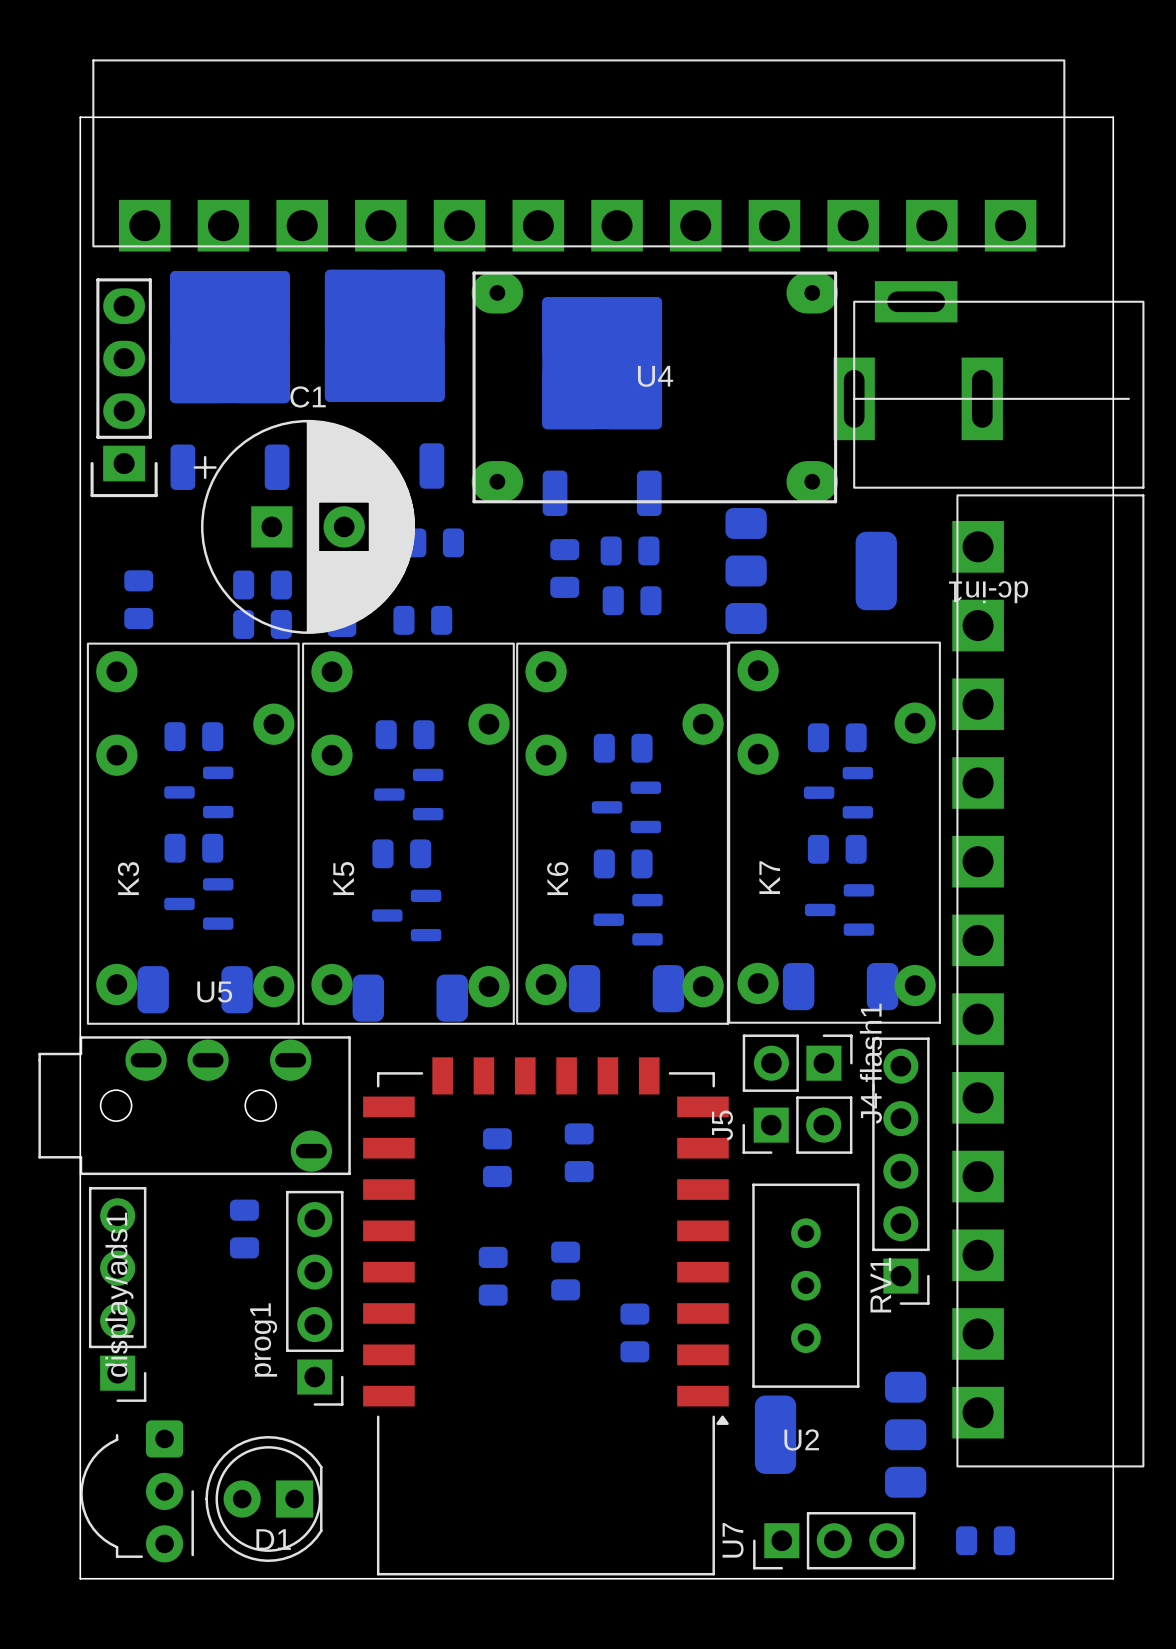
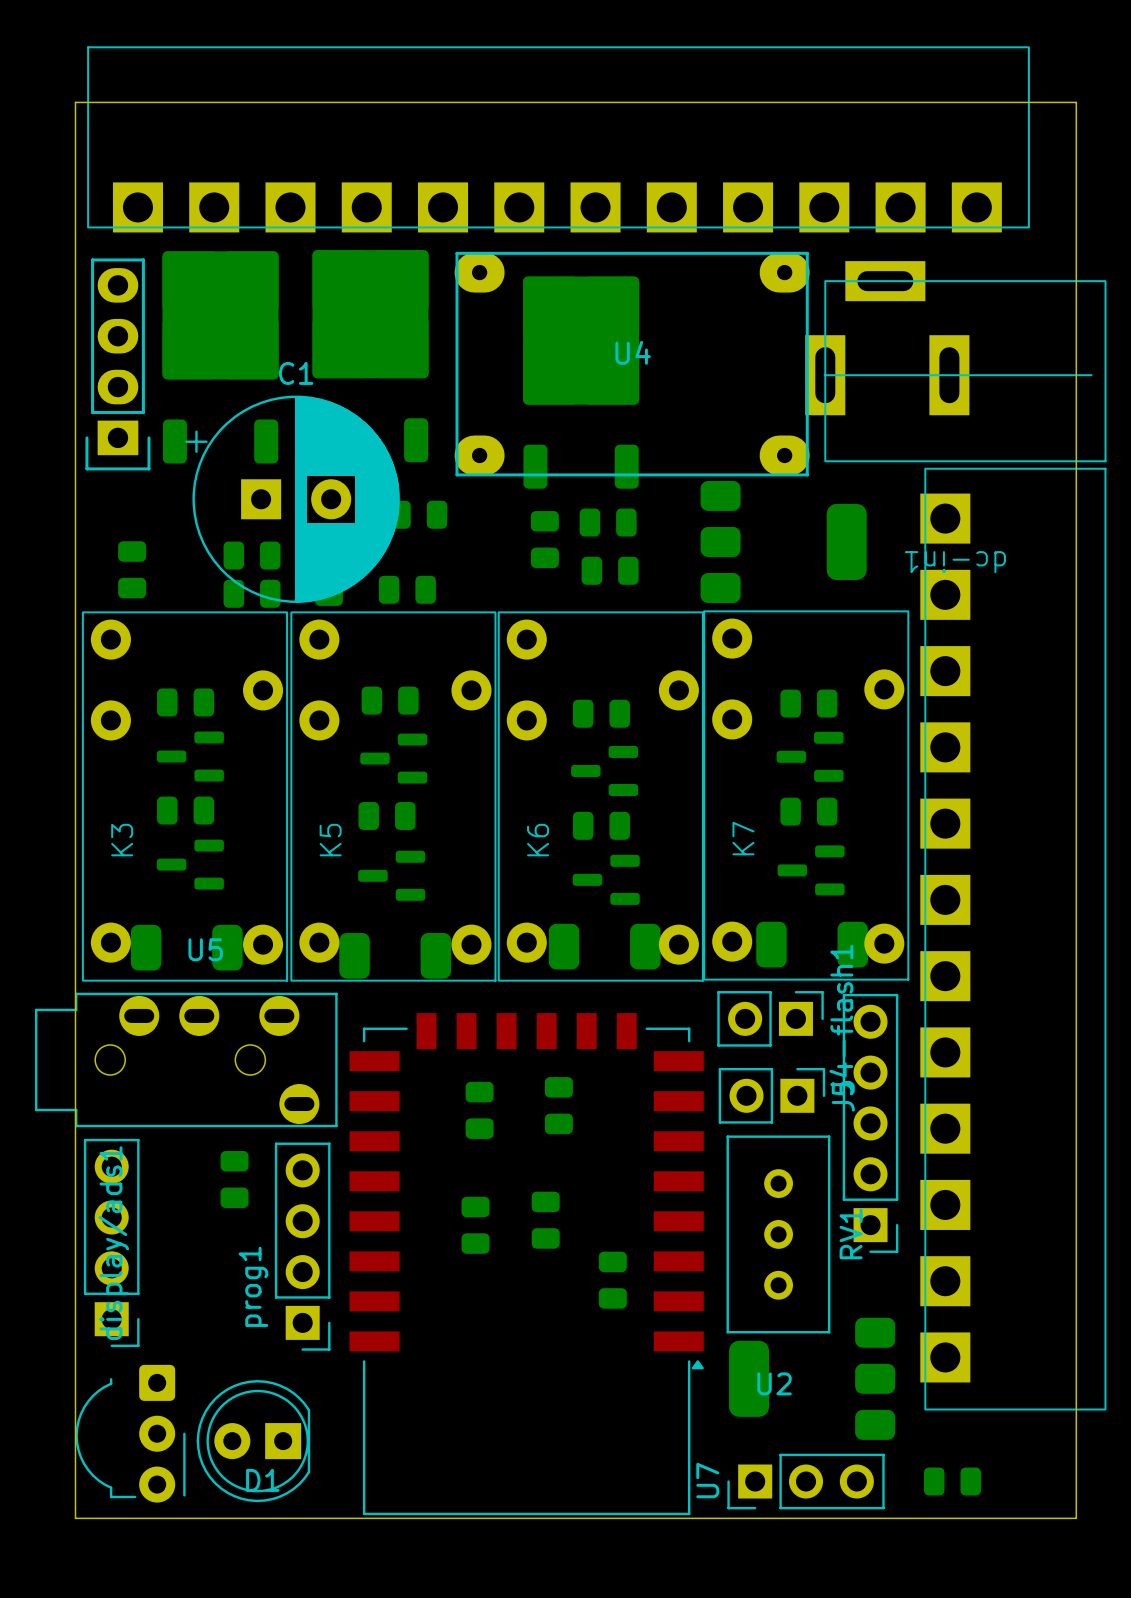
J5 rotation: 0° (797, 1125) -> 180° (771, 1095)

